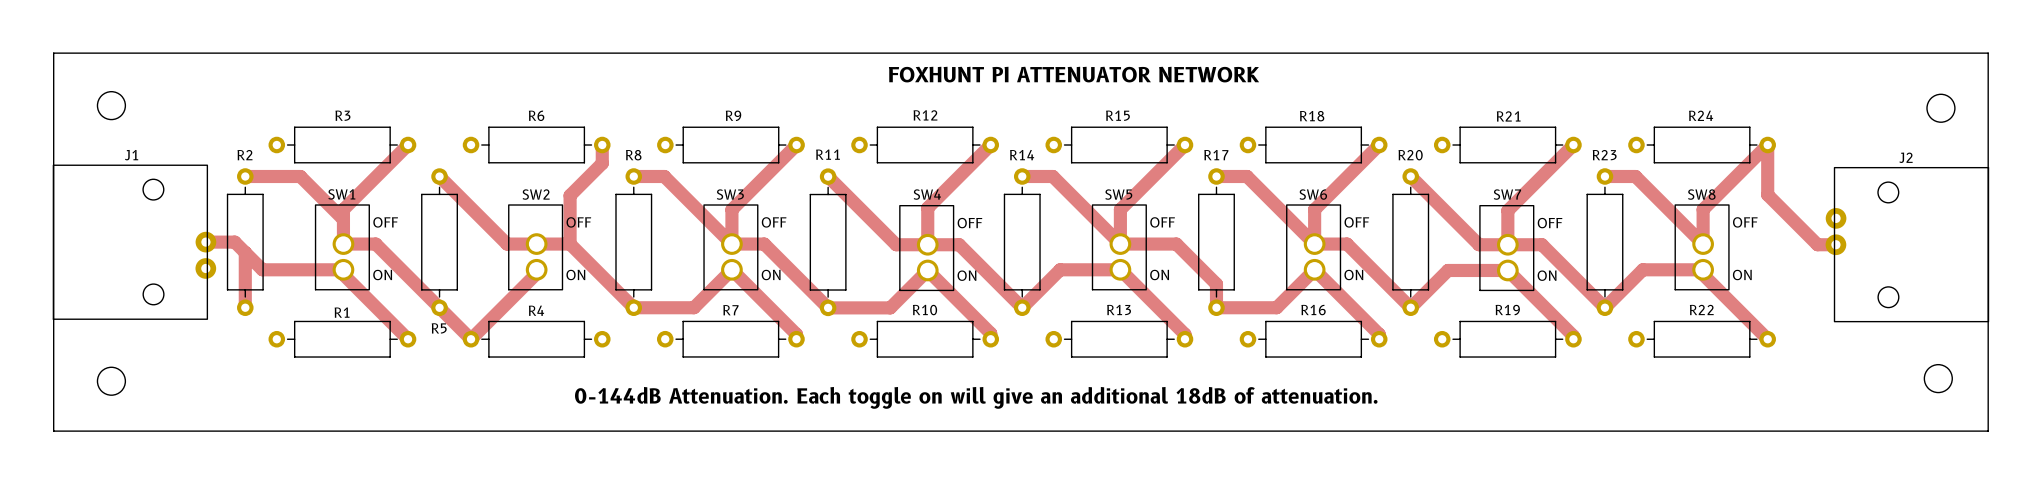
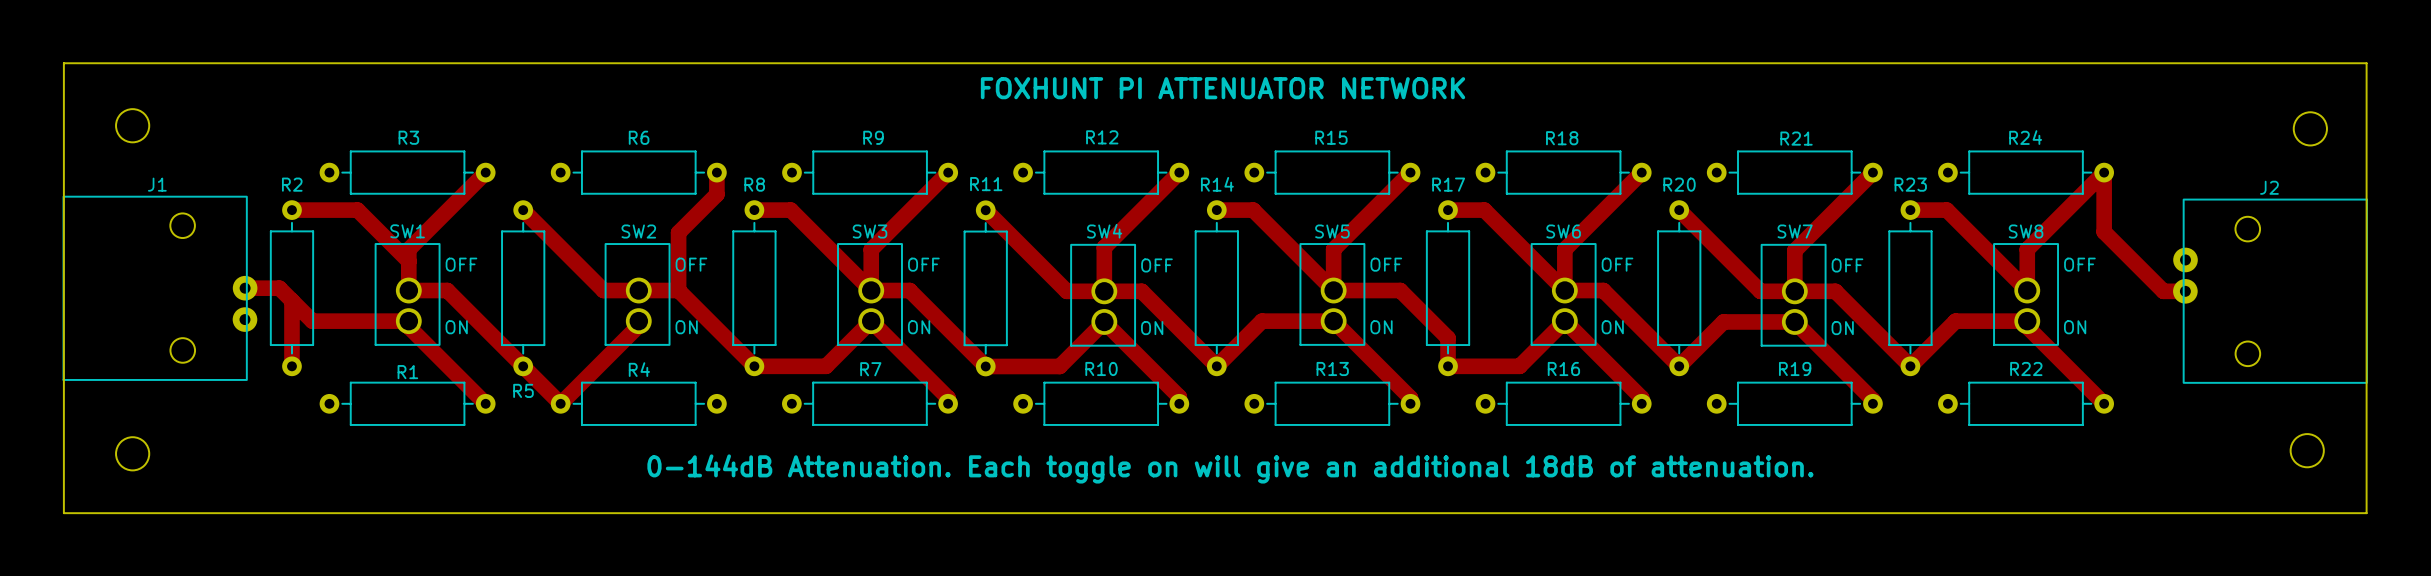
text position: FOXHUNT PI ATTENUATOR NETWORK (1074, 74) -> FOXHUNT PI ATTENUATOR NETWORK (1223, 88)
text position: 0-144dB Attenuation. Each toggle on will give an additional 18dB of attenuation. (976, 397) -> 0-144dB Attenuation. Each toggle on will give an additional 18dB of attenuation. (1230, 468)

